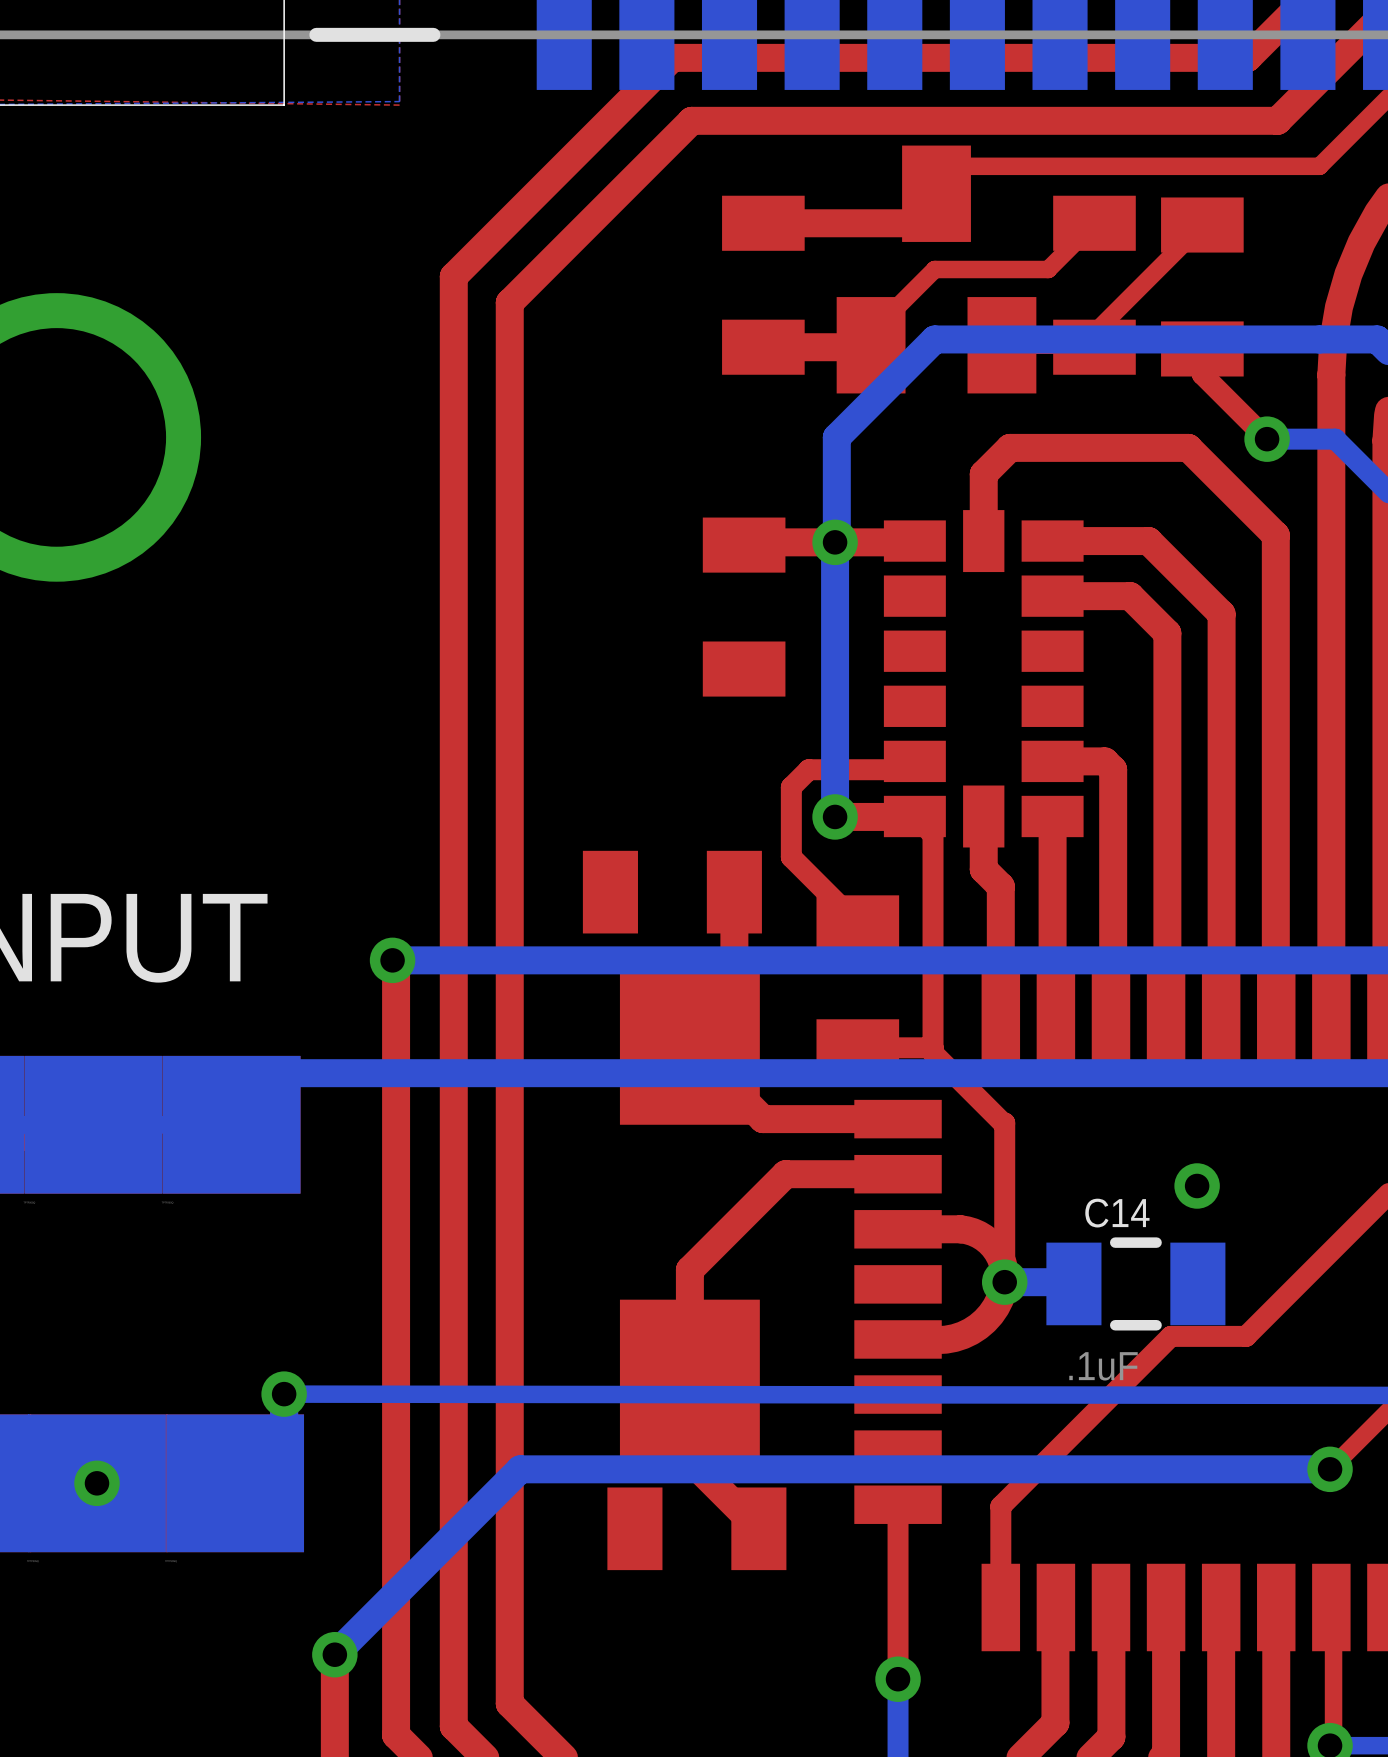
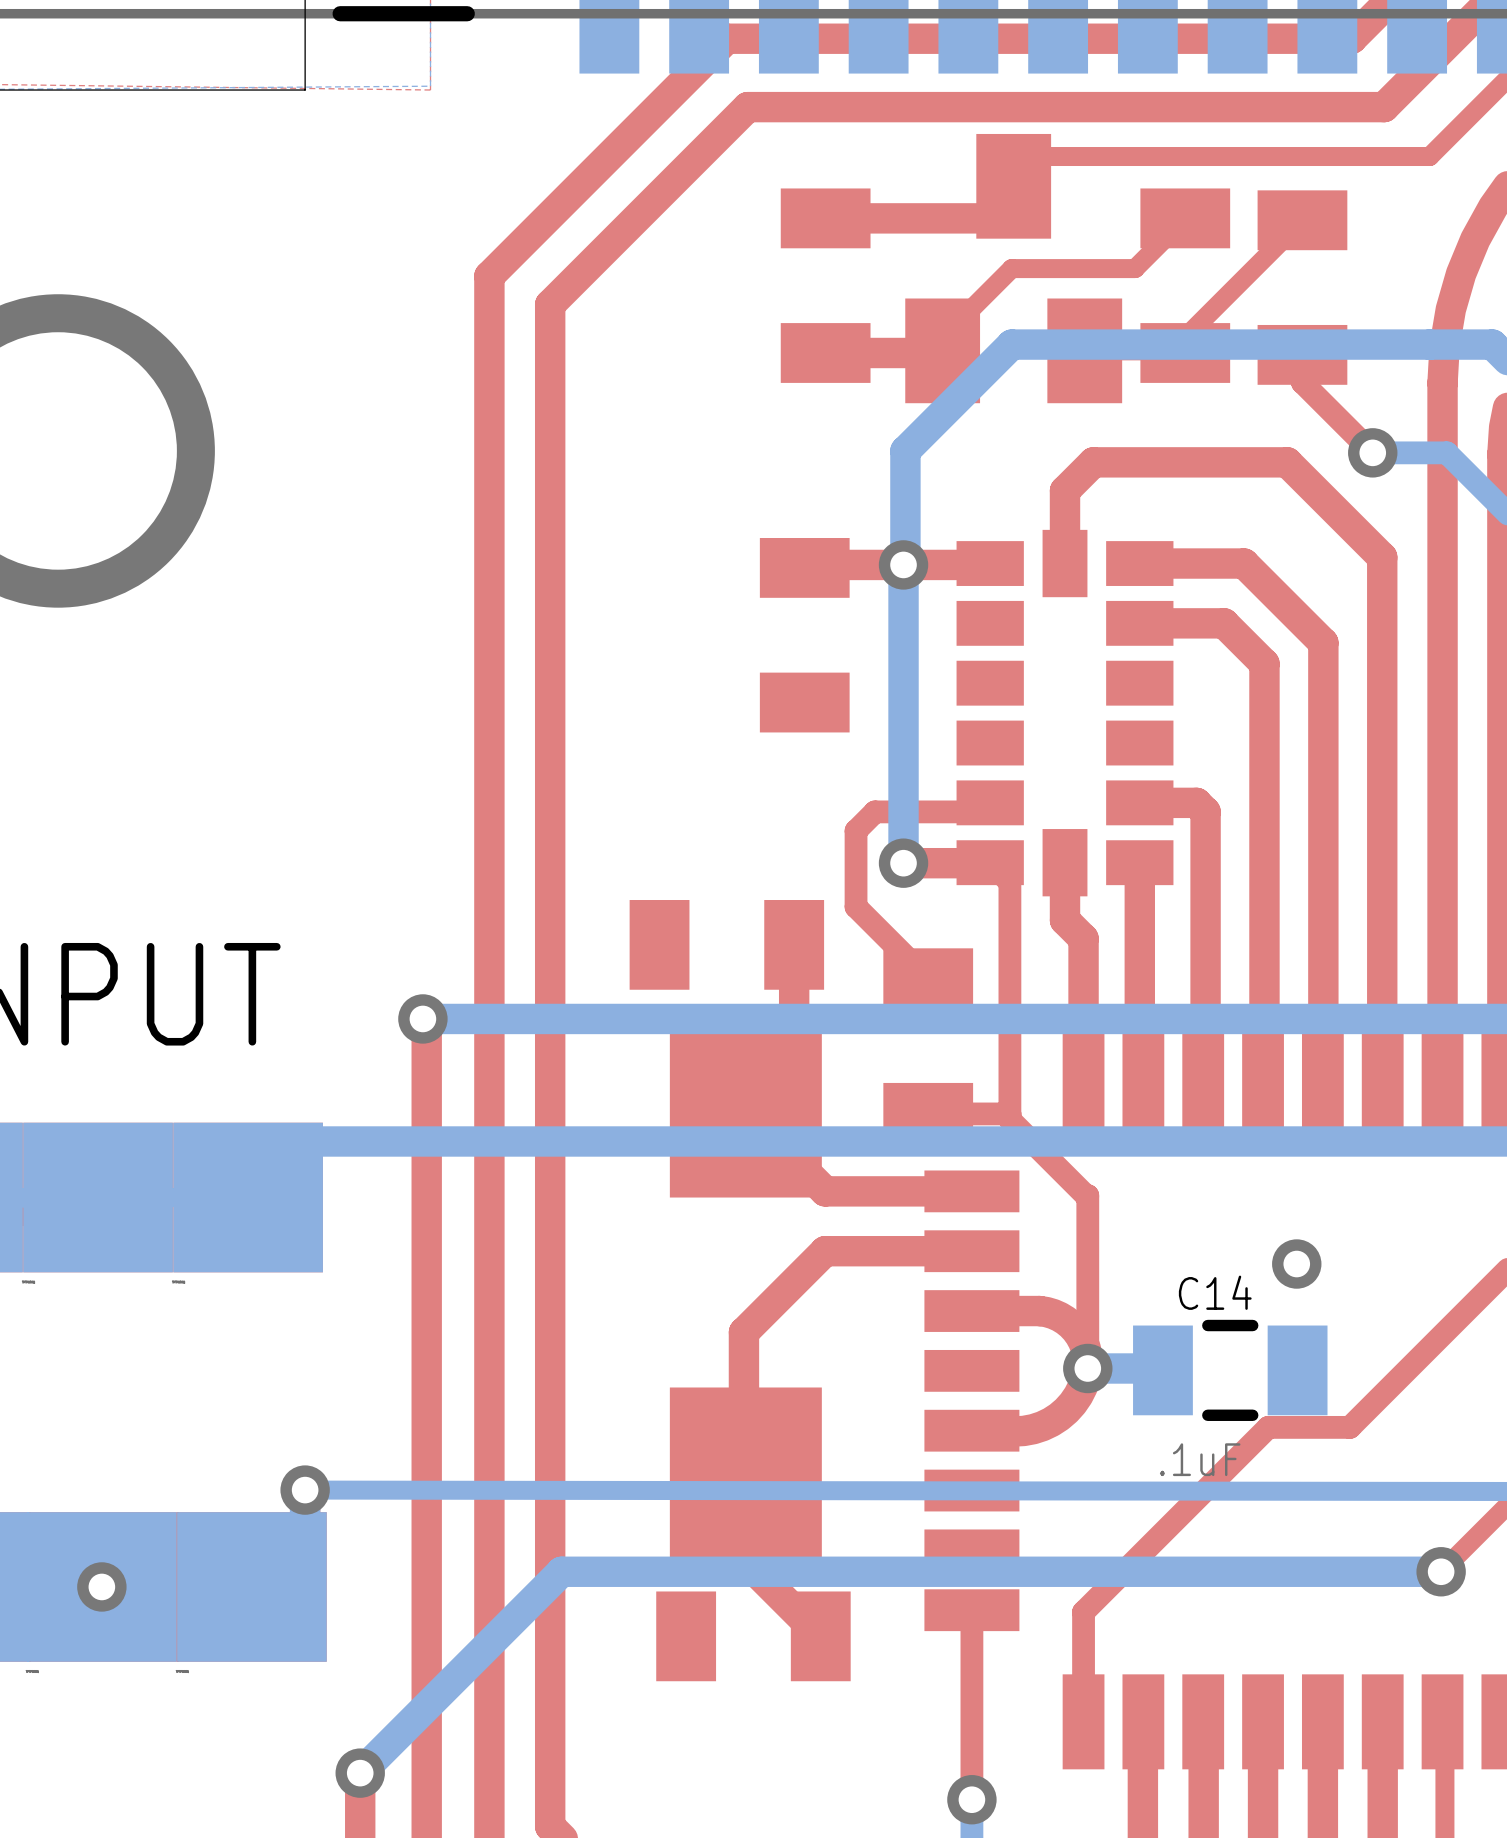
top track: (785, 1174) (689, 1269) (689, 1378) -> (849, 1251) (825, 1251) (743, 1332) (743, 1471) (745, 1472)

